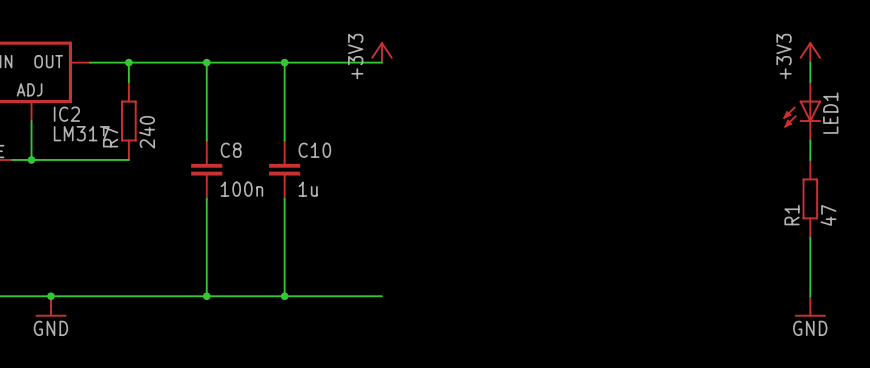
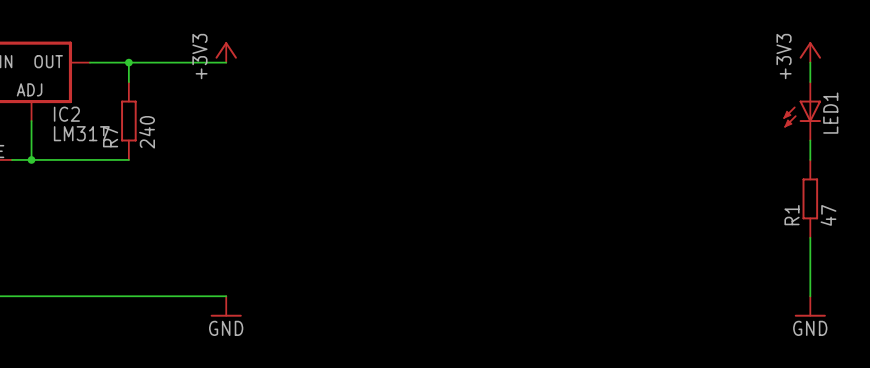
power symbol position: +3V3 (381, 52) -> +3V3 (226, 52)
wire: (206, 62) (206, 140) -> none
junction: (206, 62) -> none
wire: (226, 62) (381, 62) -> none
wire: (284, 62) (284, 140) -> none
junction: (284, 62) -> none
C8: 100n (206, 169) -> none
C10: 1u (284, 169) -> none
wire: (206, 198) (206, 296) -> none
wire: (284, 198) (284, 296) -> none
junction: (51, 296) -> none
junction: (206, 296) -> none
wire: (226, 296) (381, 296) -> none
junction: (284, 296) -> none
power symbol position: GND (51, 306) -> GND (226, 306)

